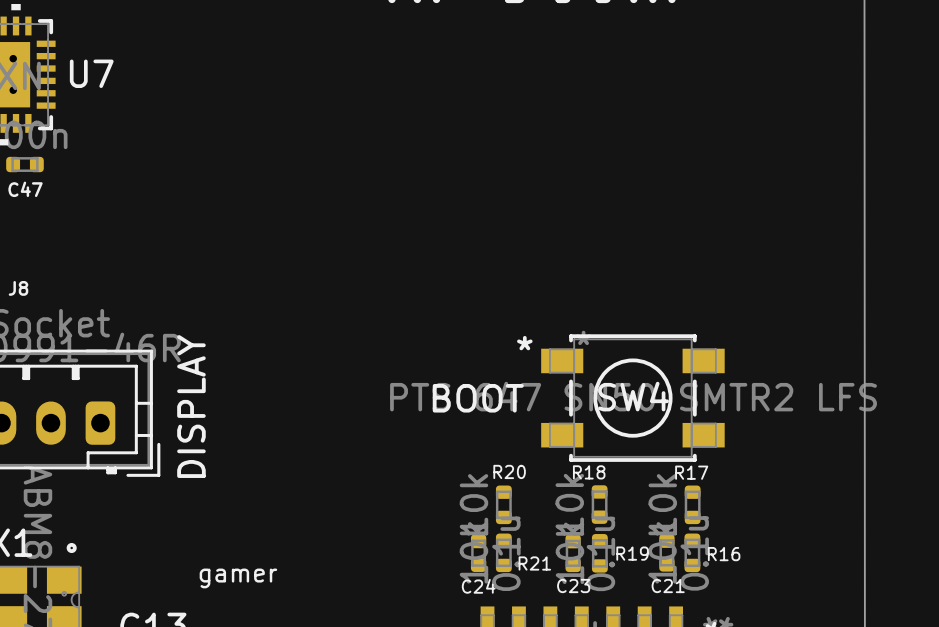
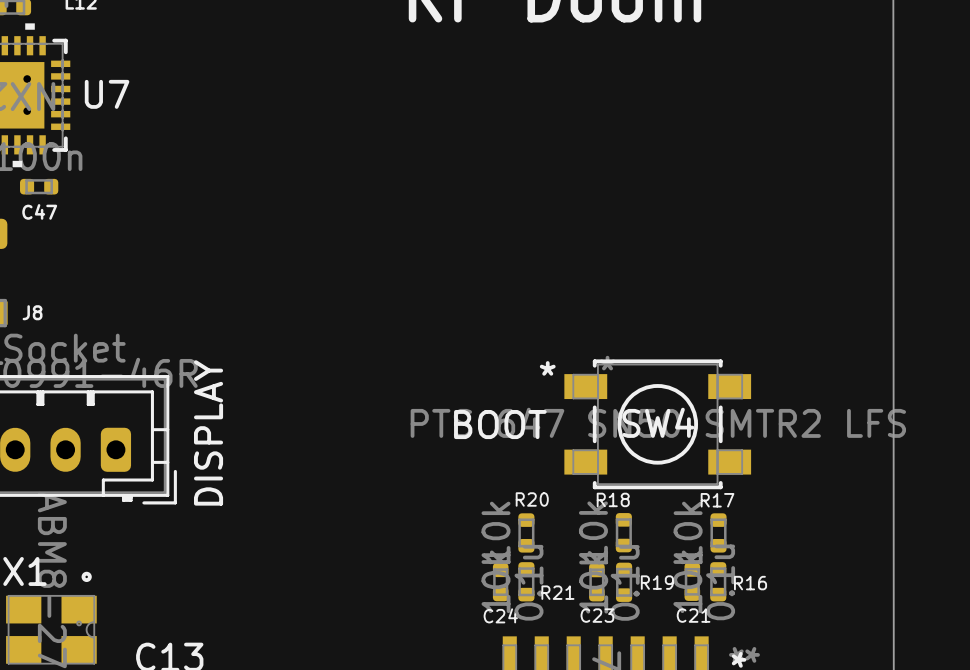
text: gamer (238, 578) -> none

